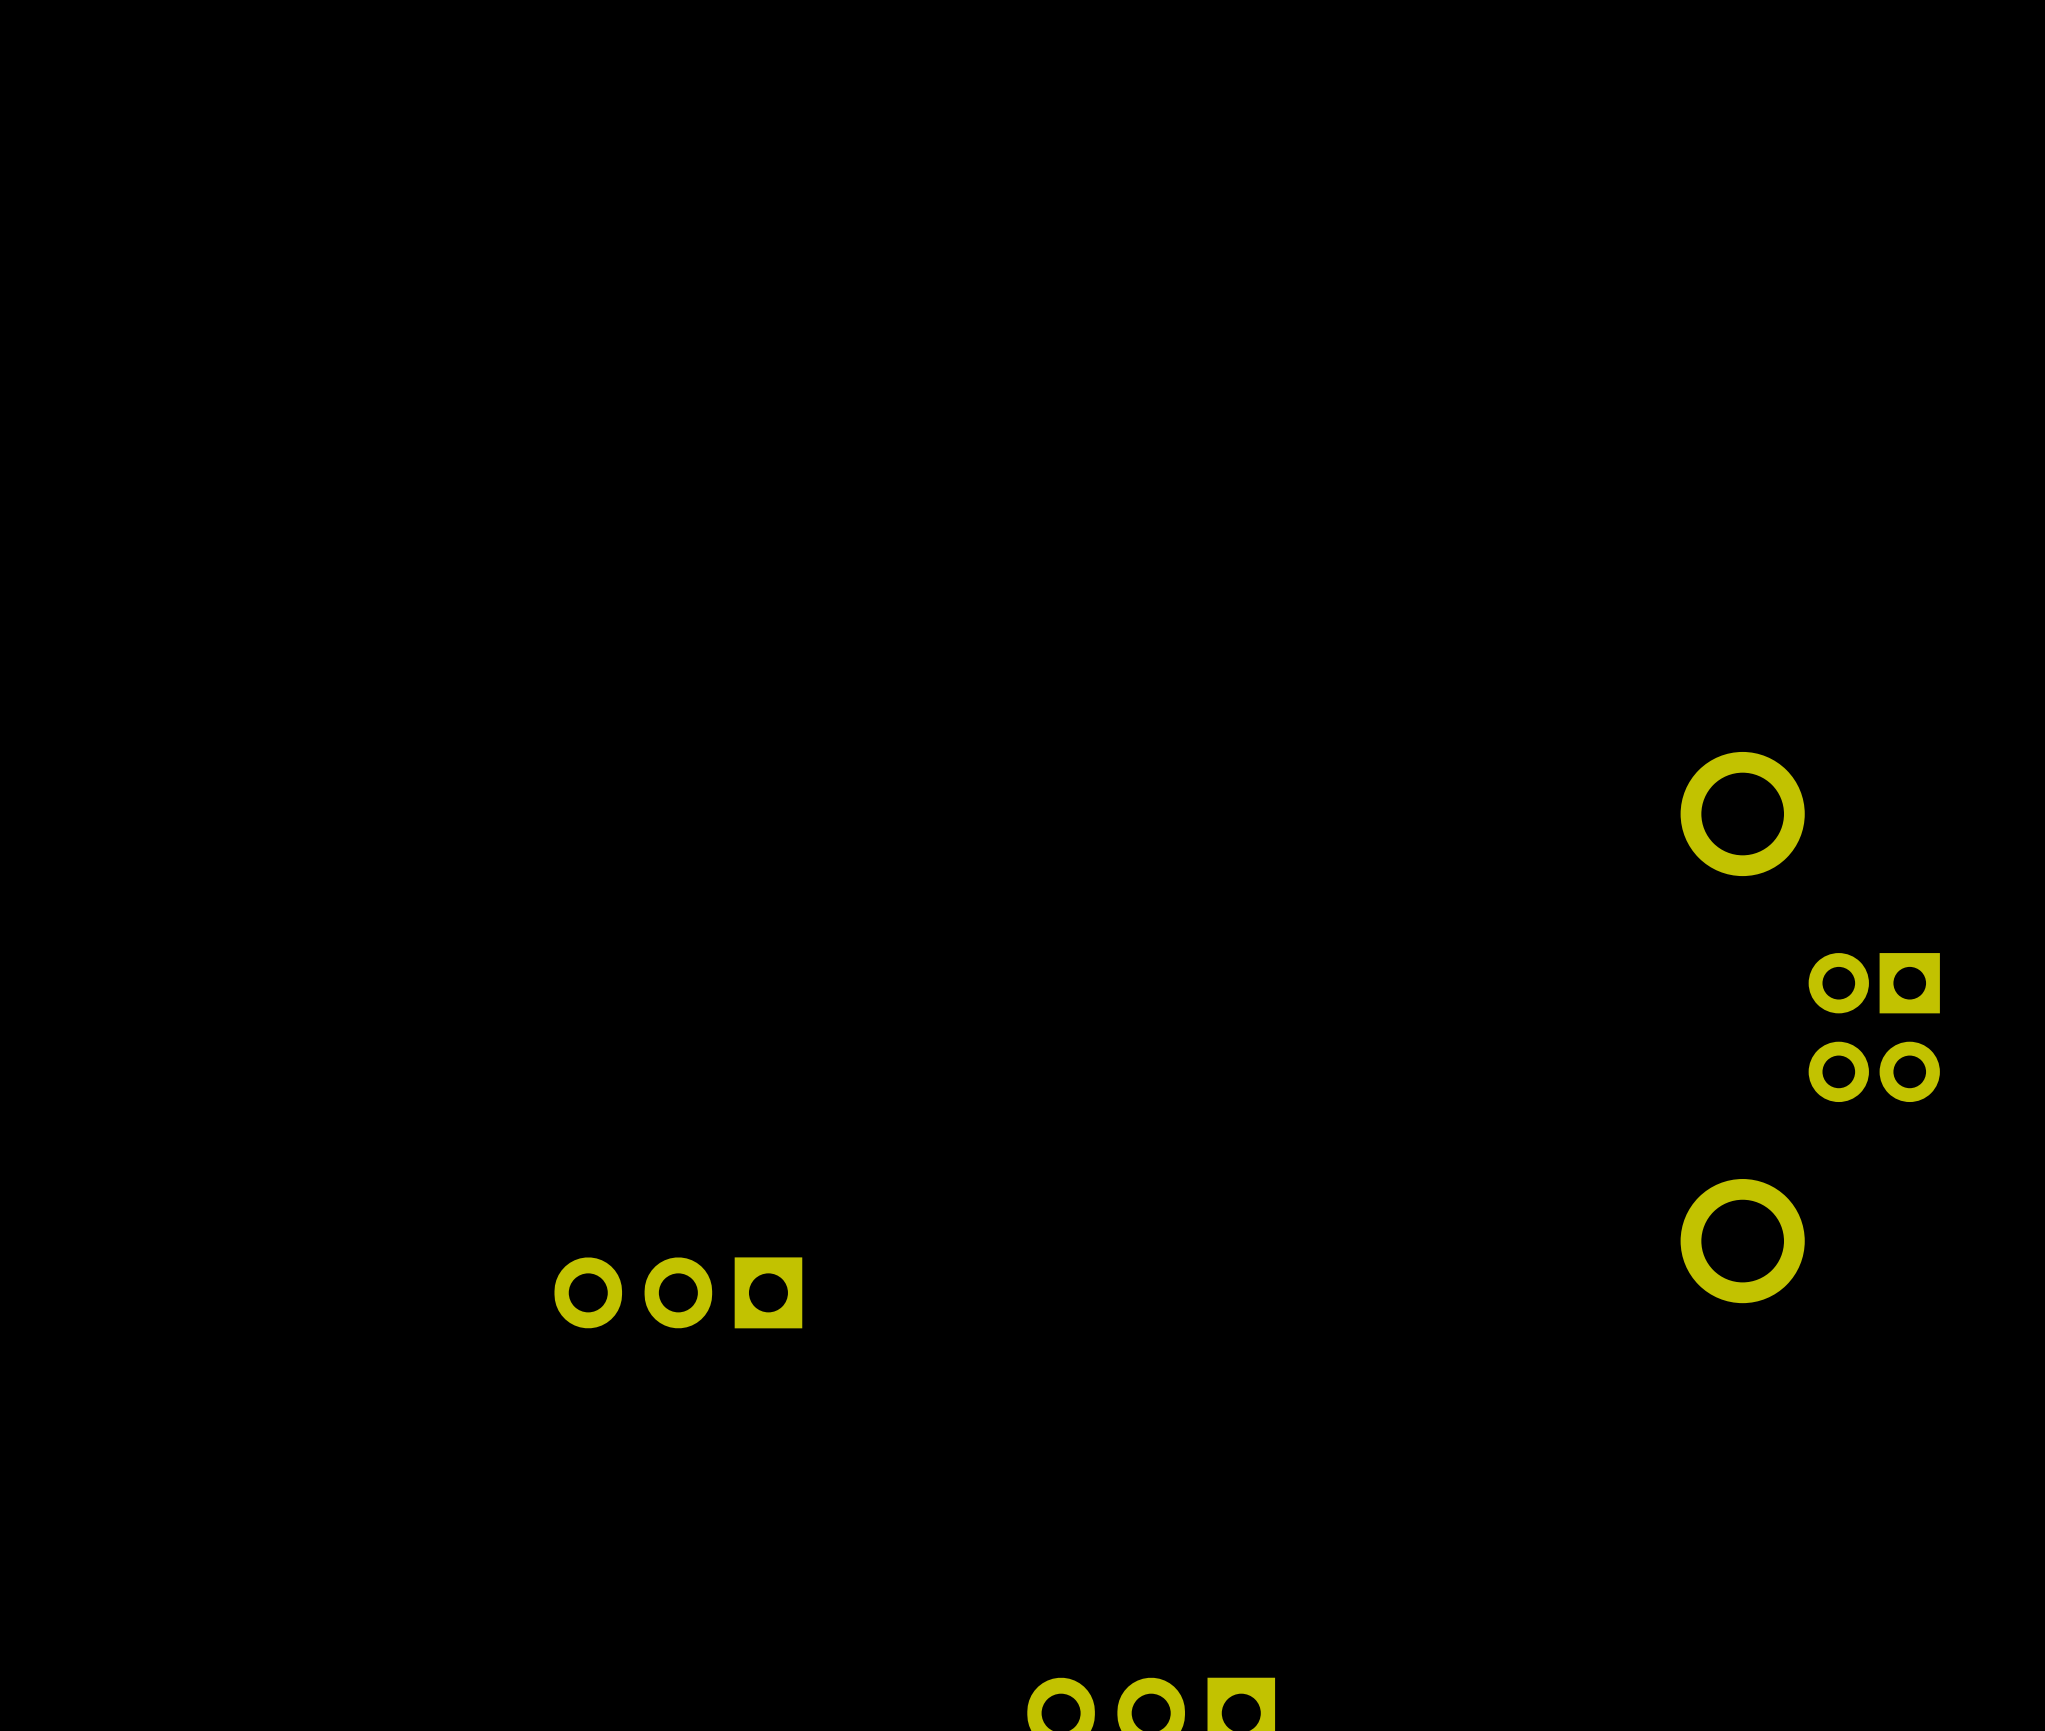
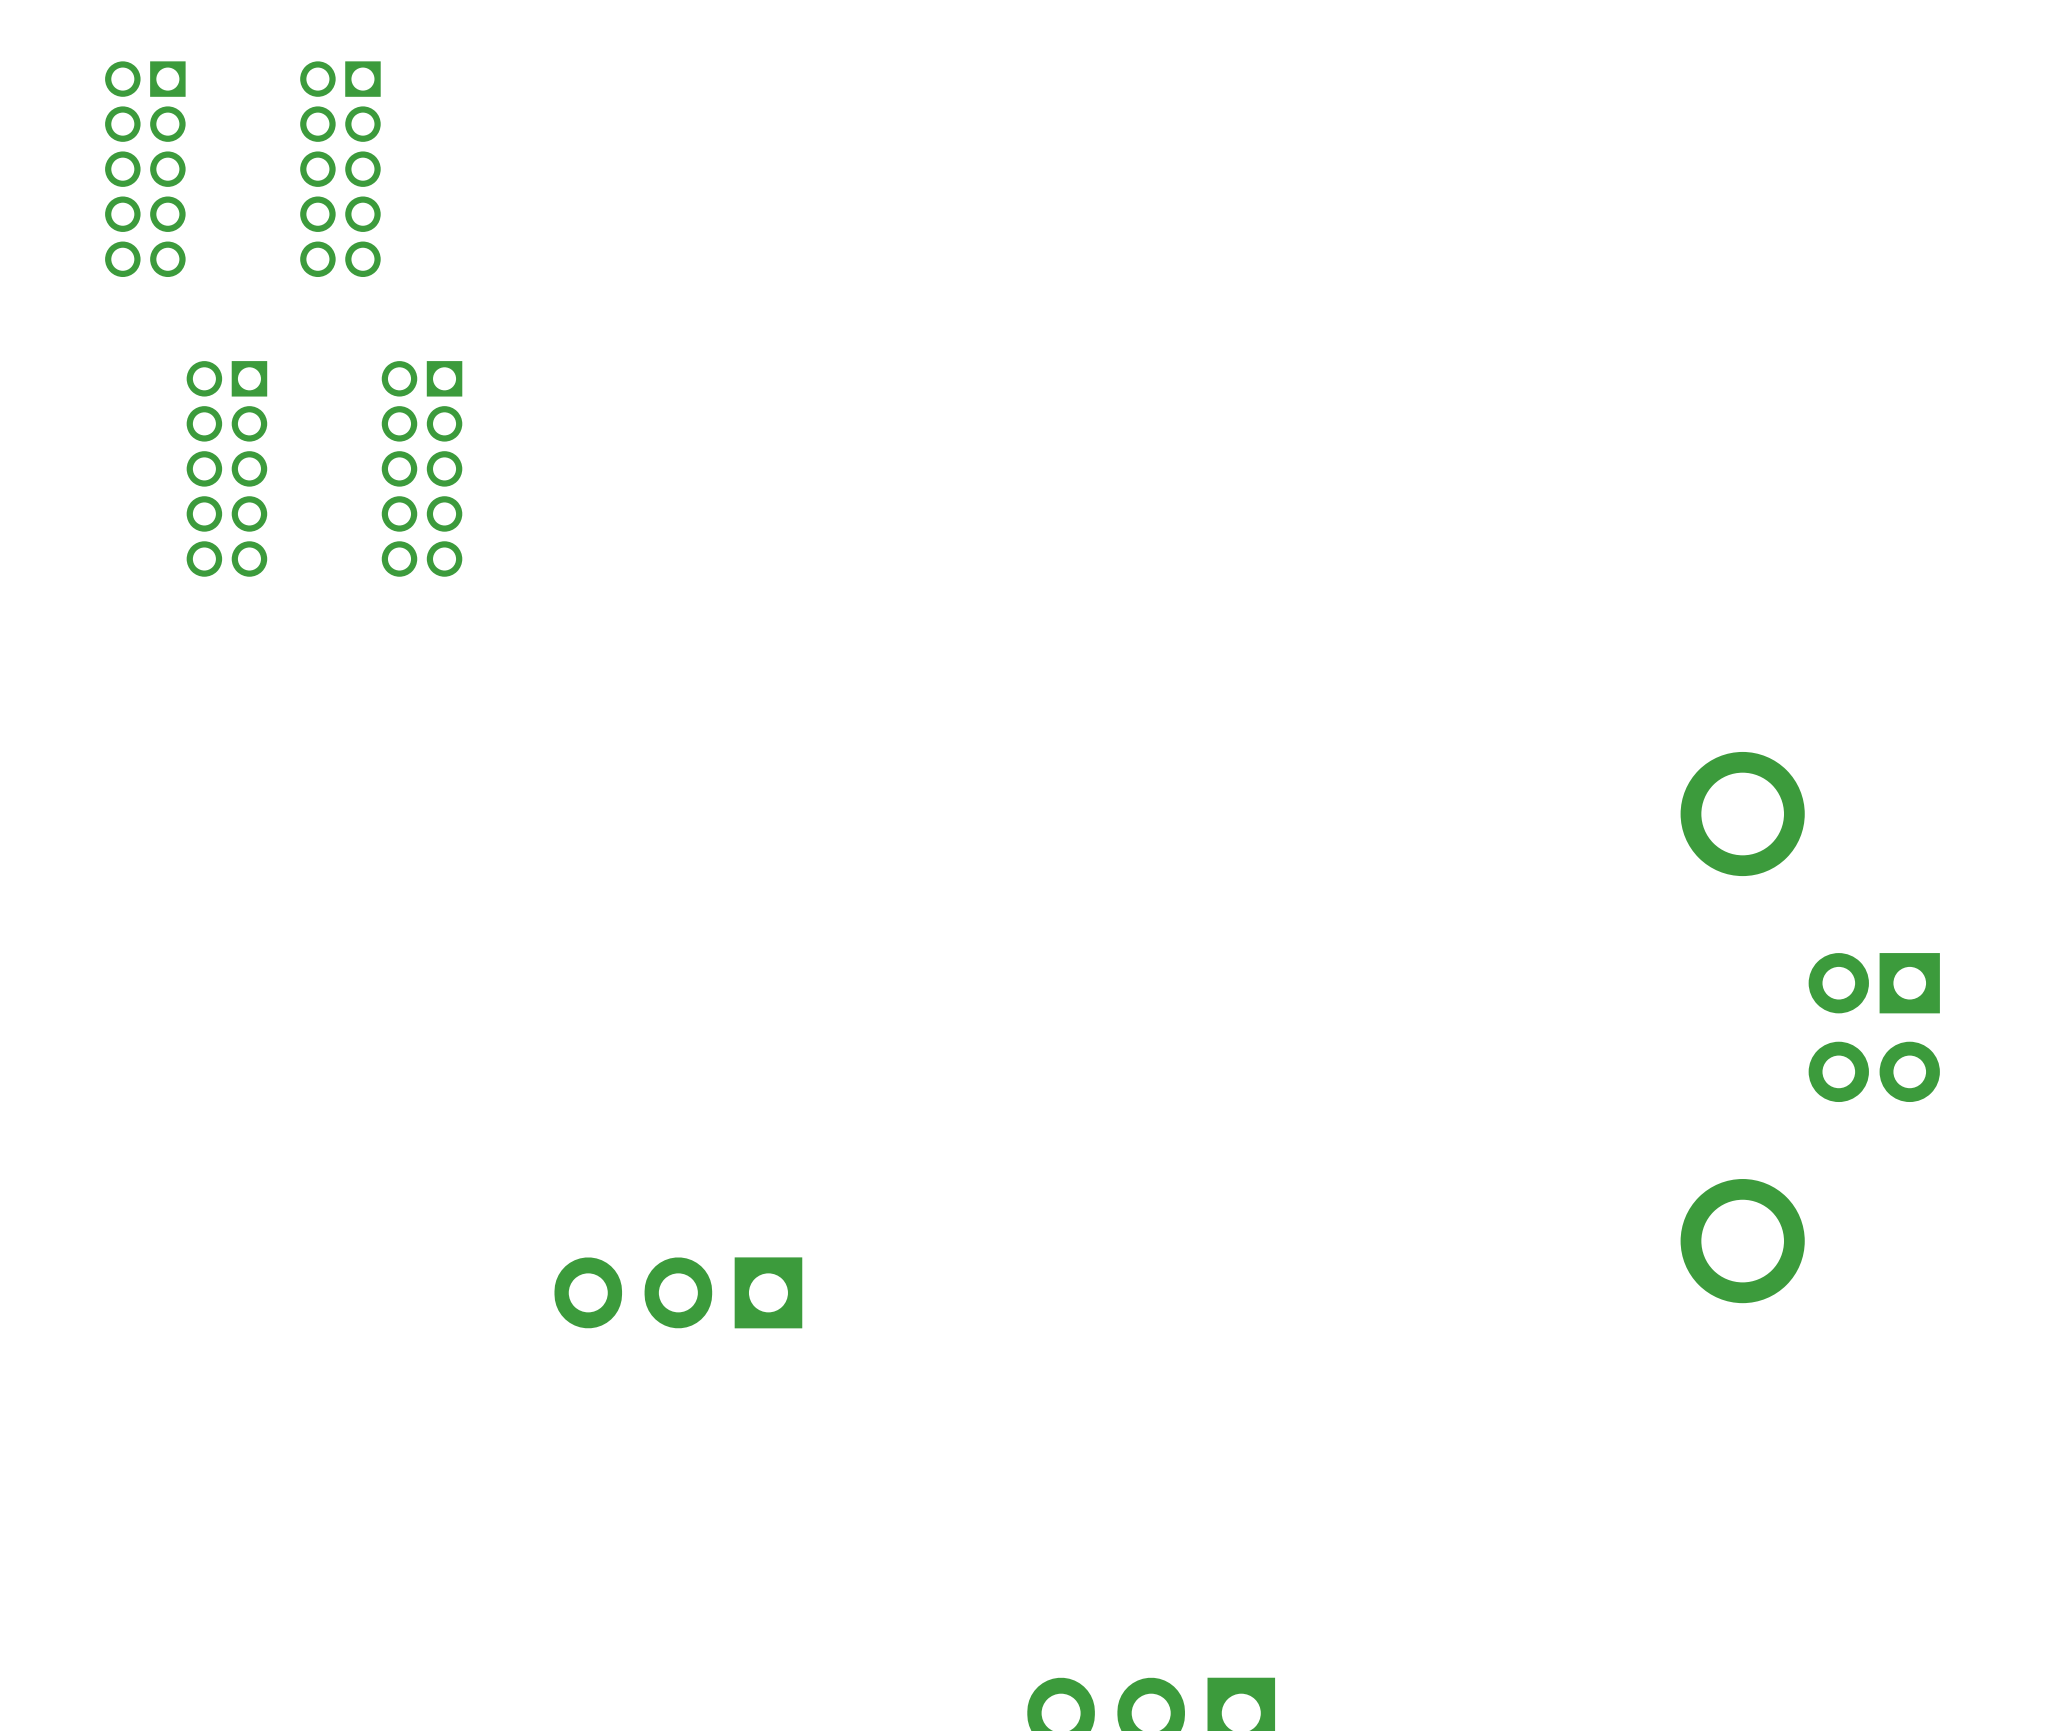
part: none -> (145, 169)
part: none -> (340, 169)
part: none -> (226, 468)
part: none -> (422, 468)

